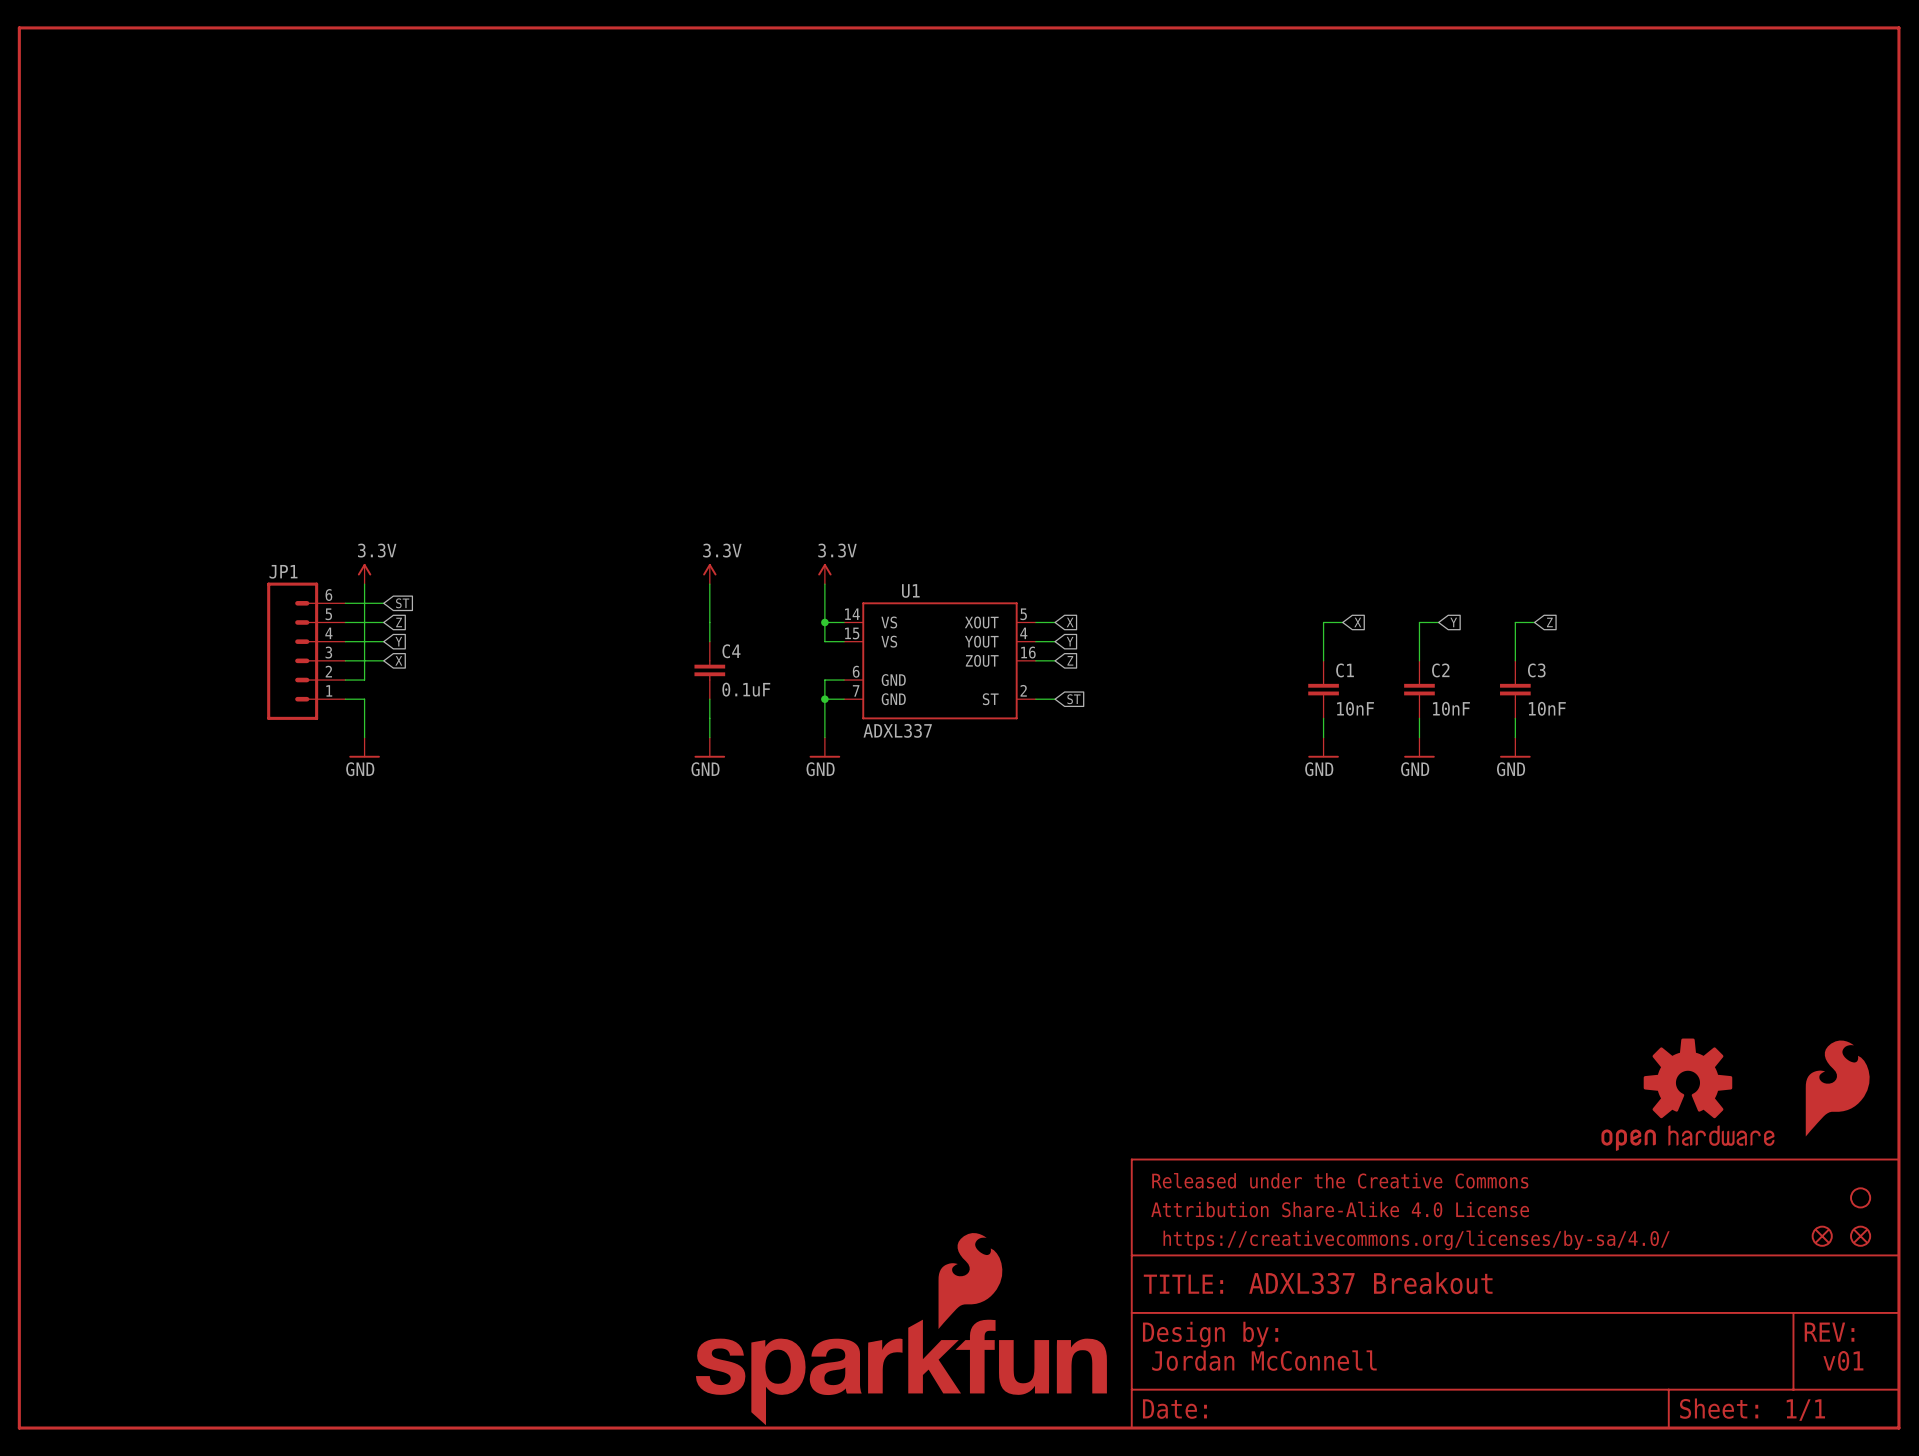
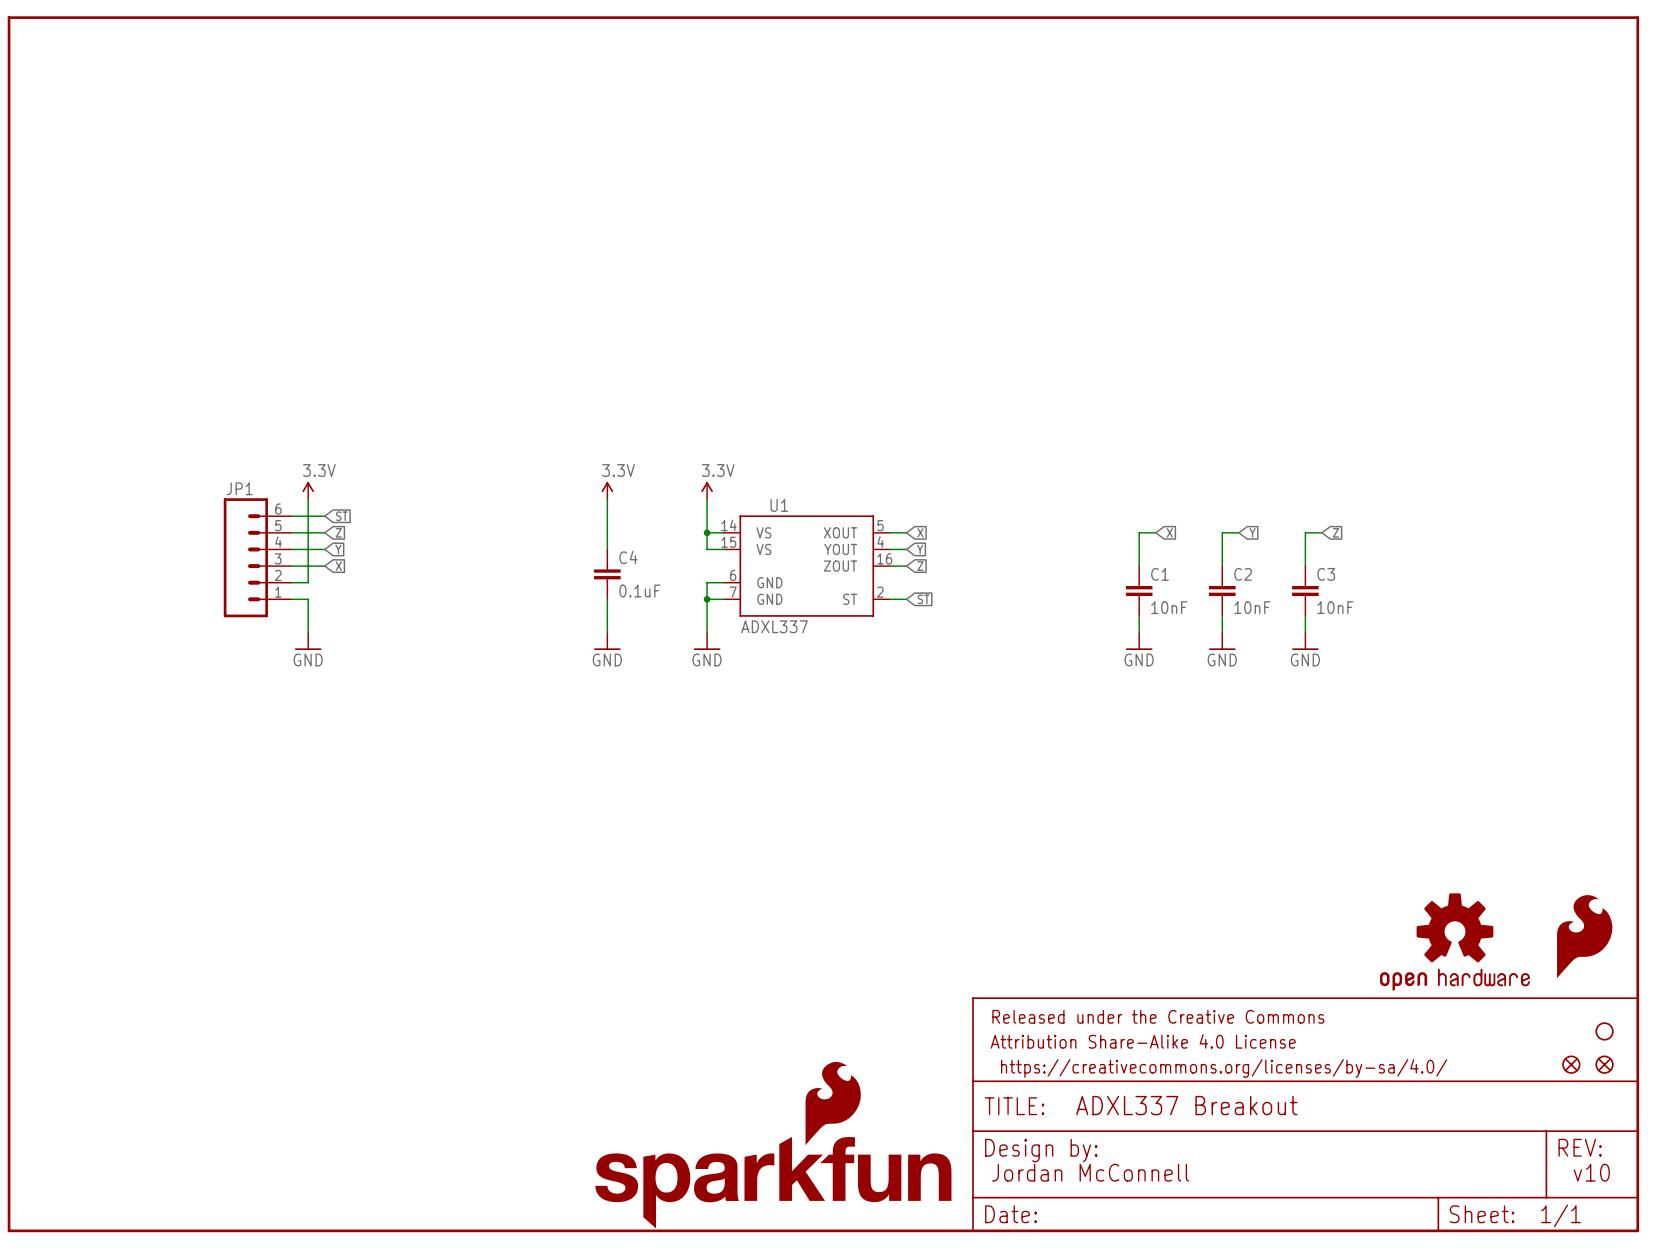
text: v01 (1843, 1360) -> v10 (1591, 1172)

